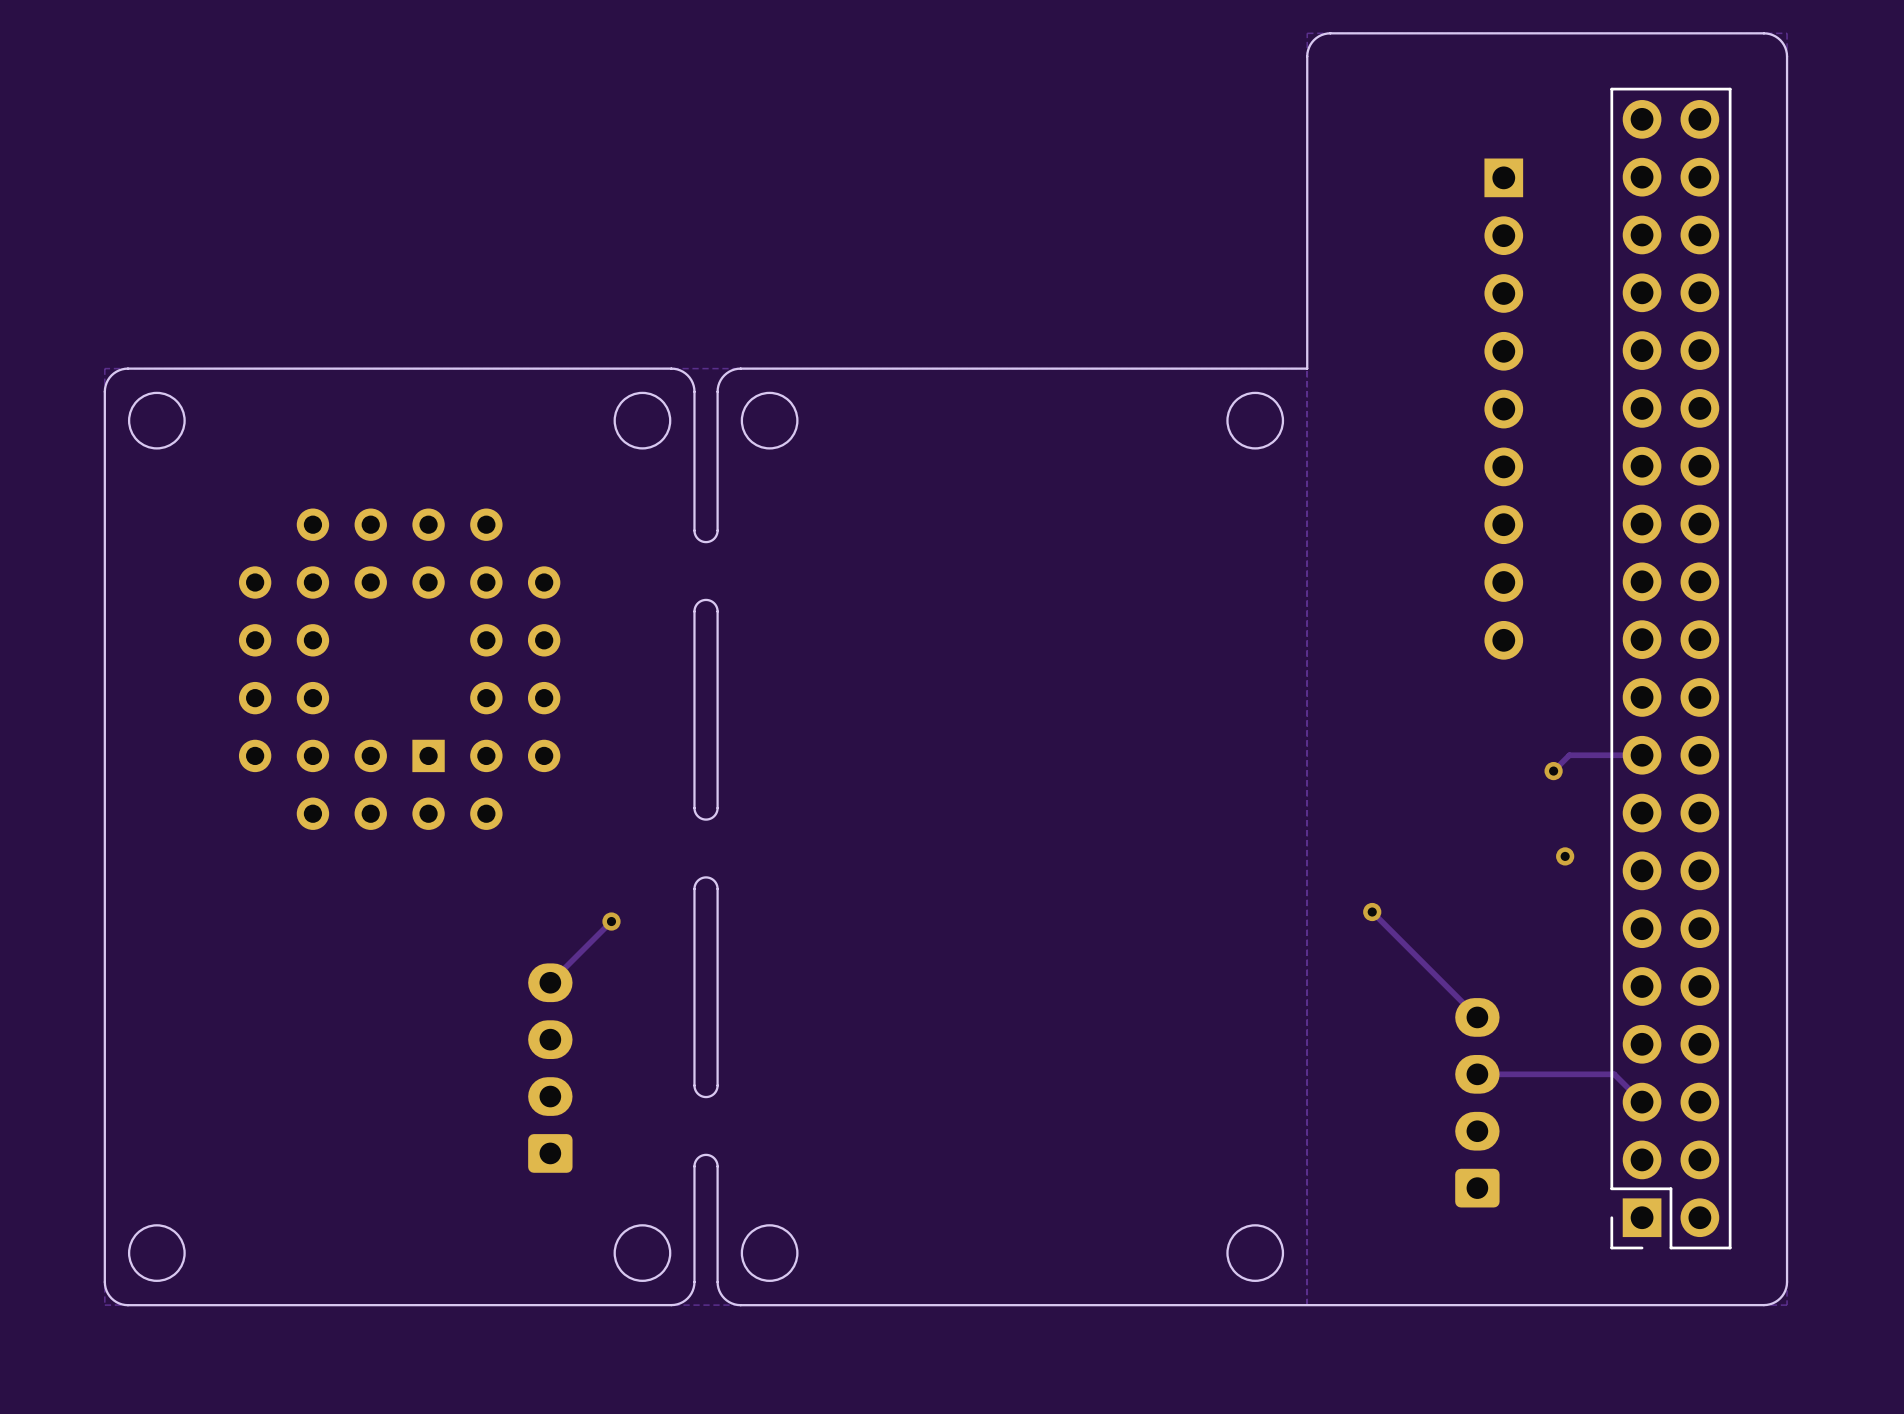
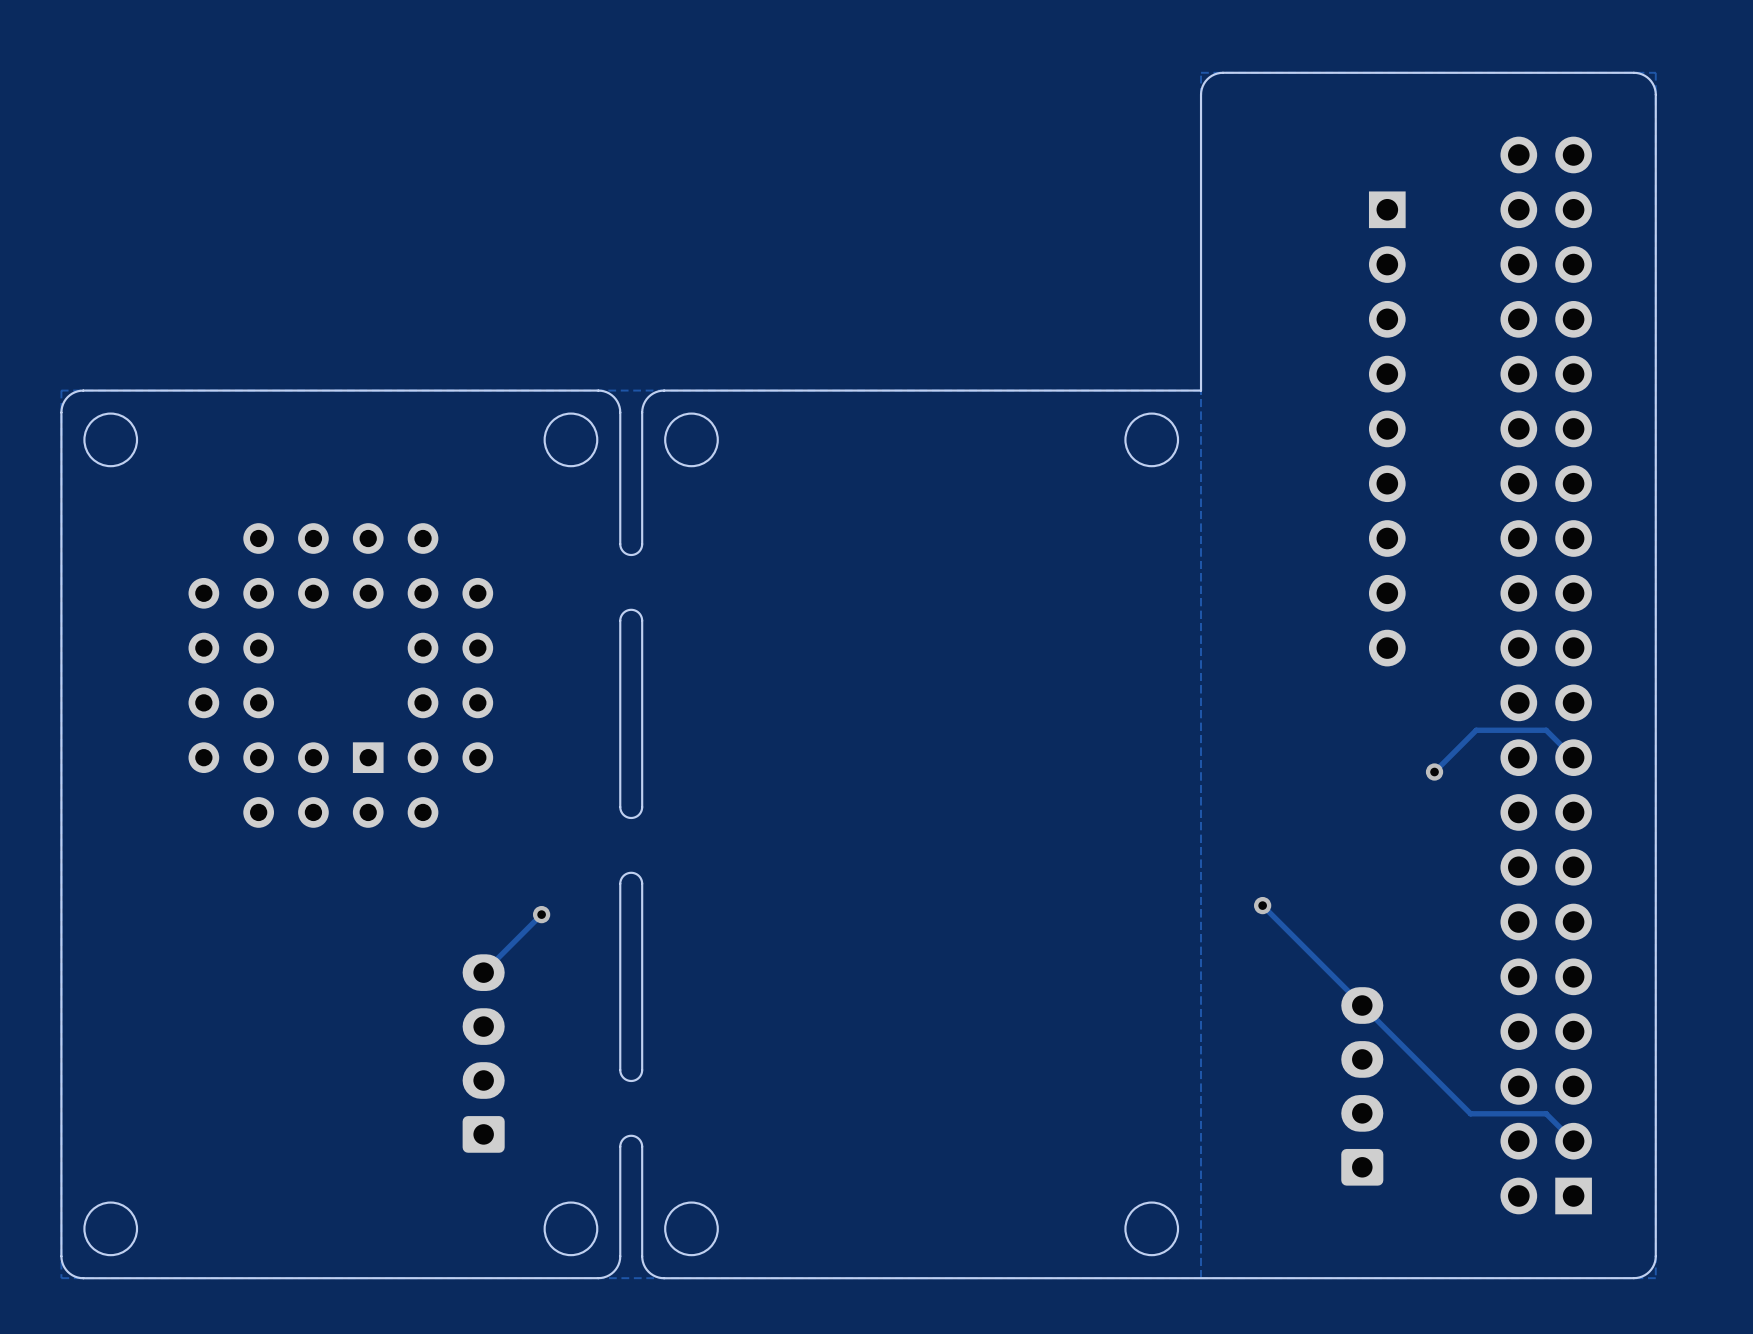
part side: bottom (1670, 668) -> top (1546, 675)
track: (1642, 755) (1569, 755) -> (1573, 757) (1546, 730) (1476, 730) (1449, 757)
via: (1565, 856) -> none
track: none -> (1362, 1005) (1470, 1113) (1546, 1113) (1573, 1141)
track: (1477, 1074) (1614, 1074) (1642, 1102) -> none

